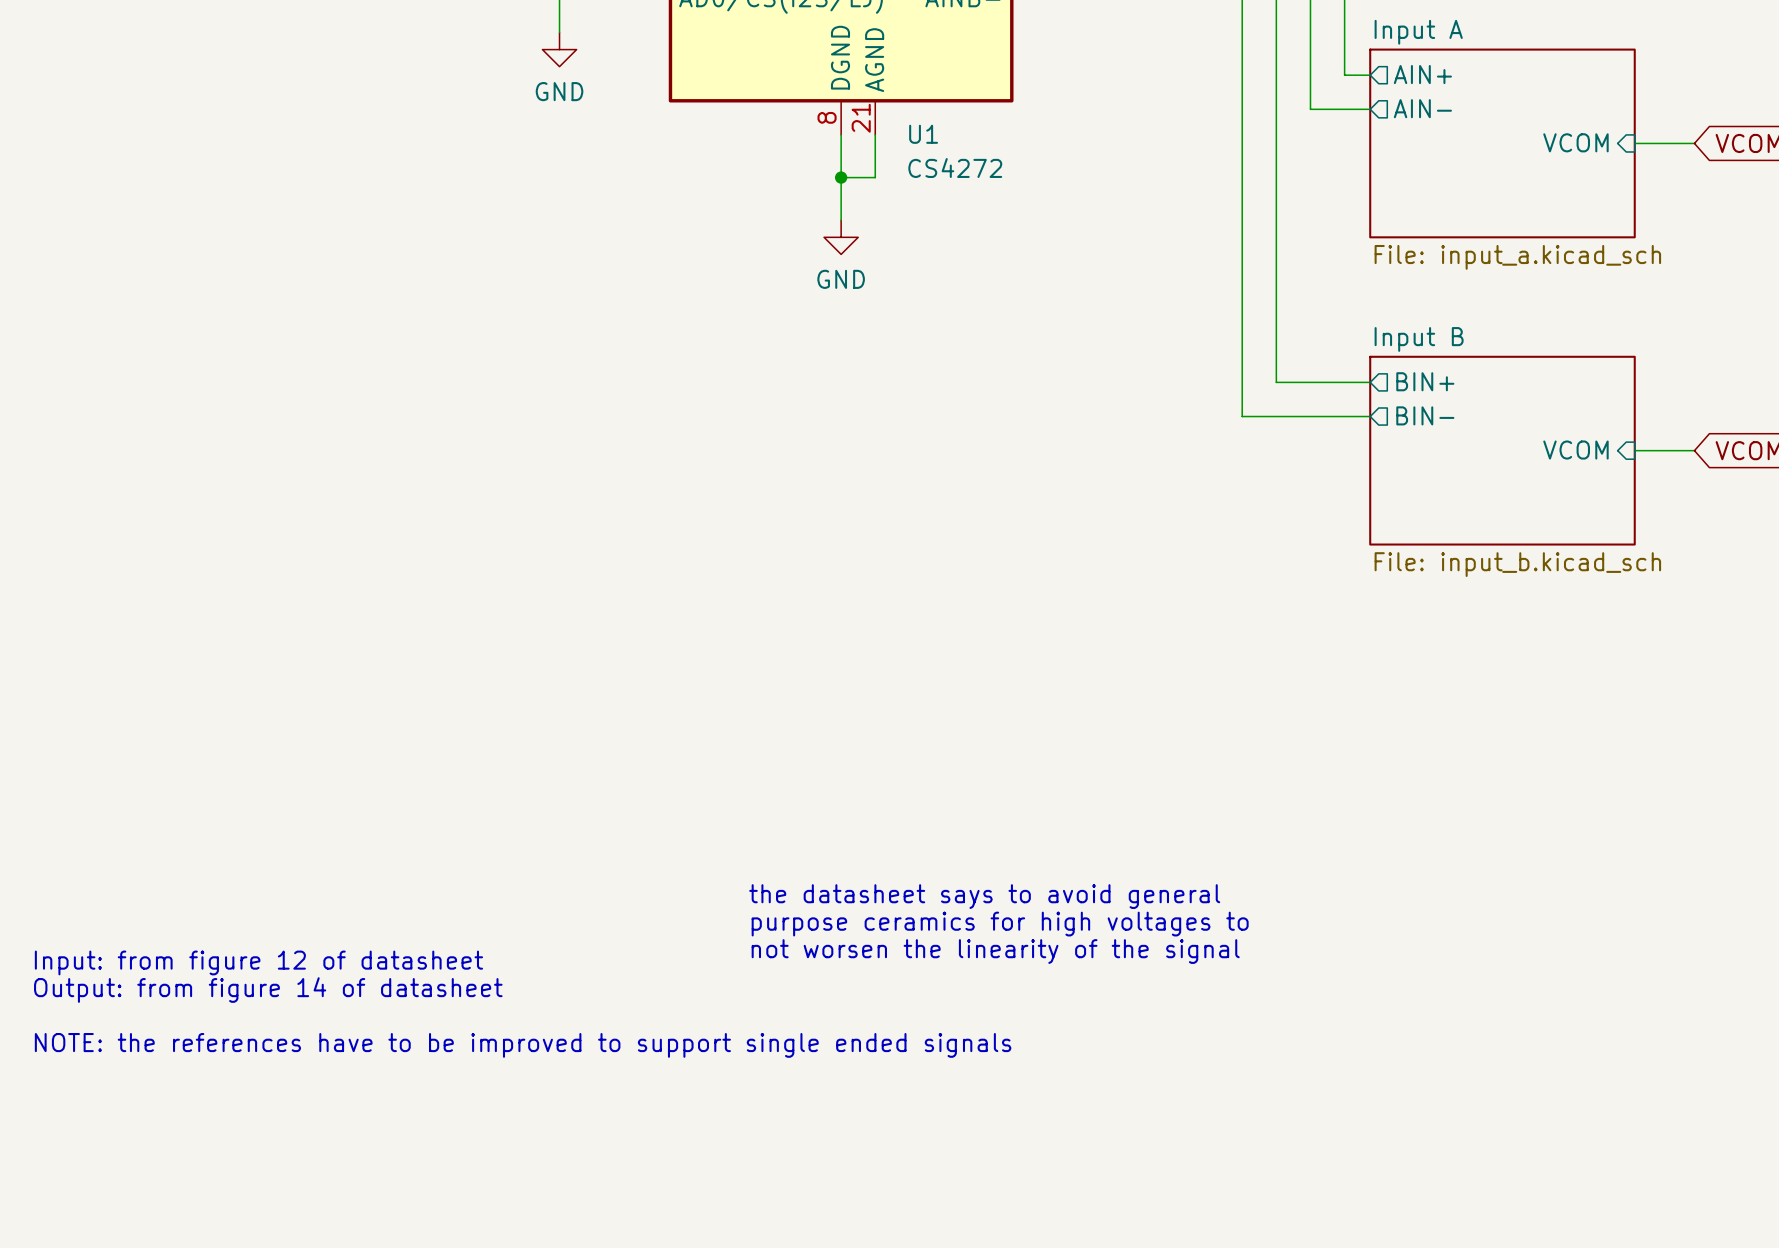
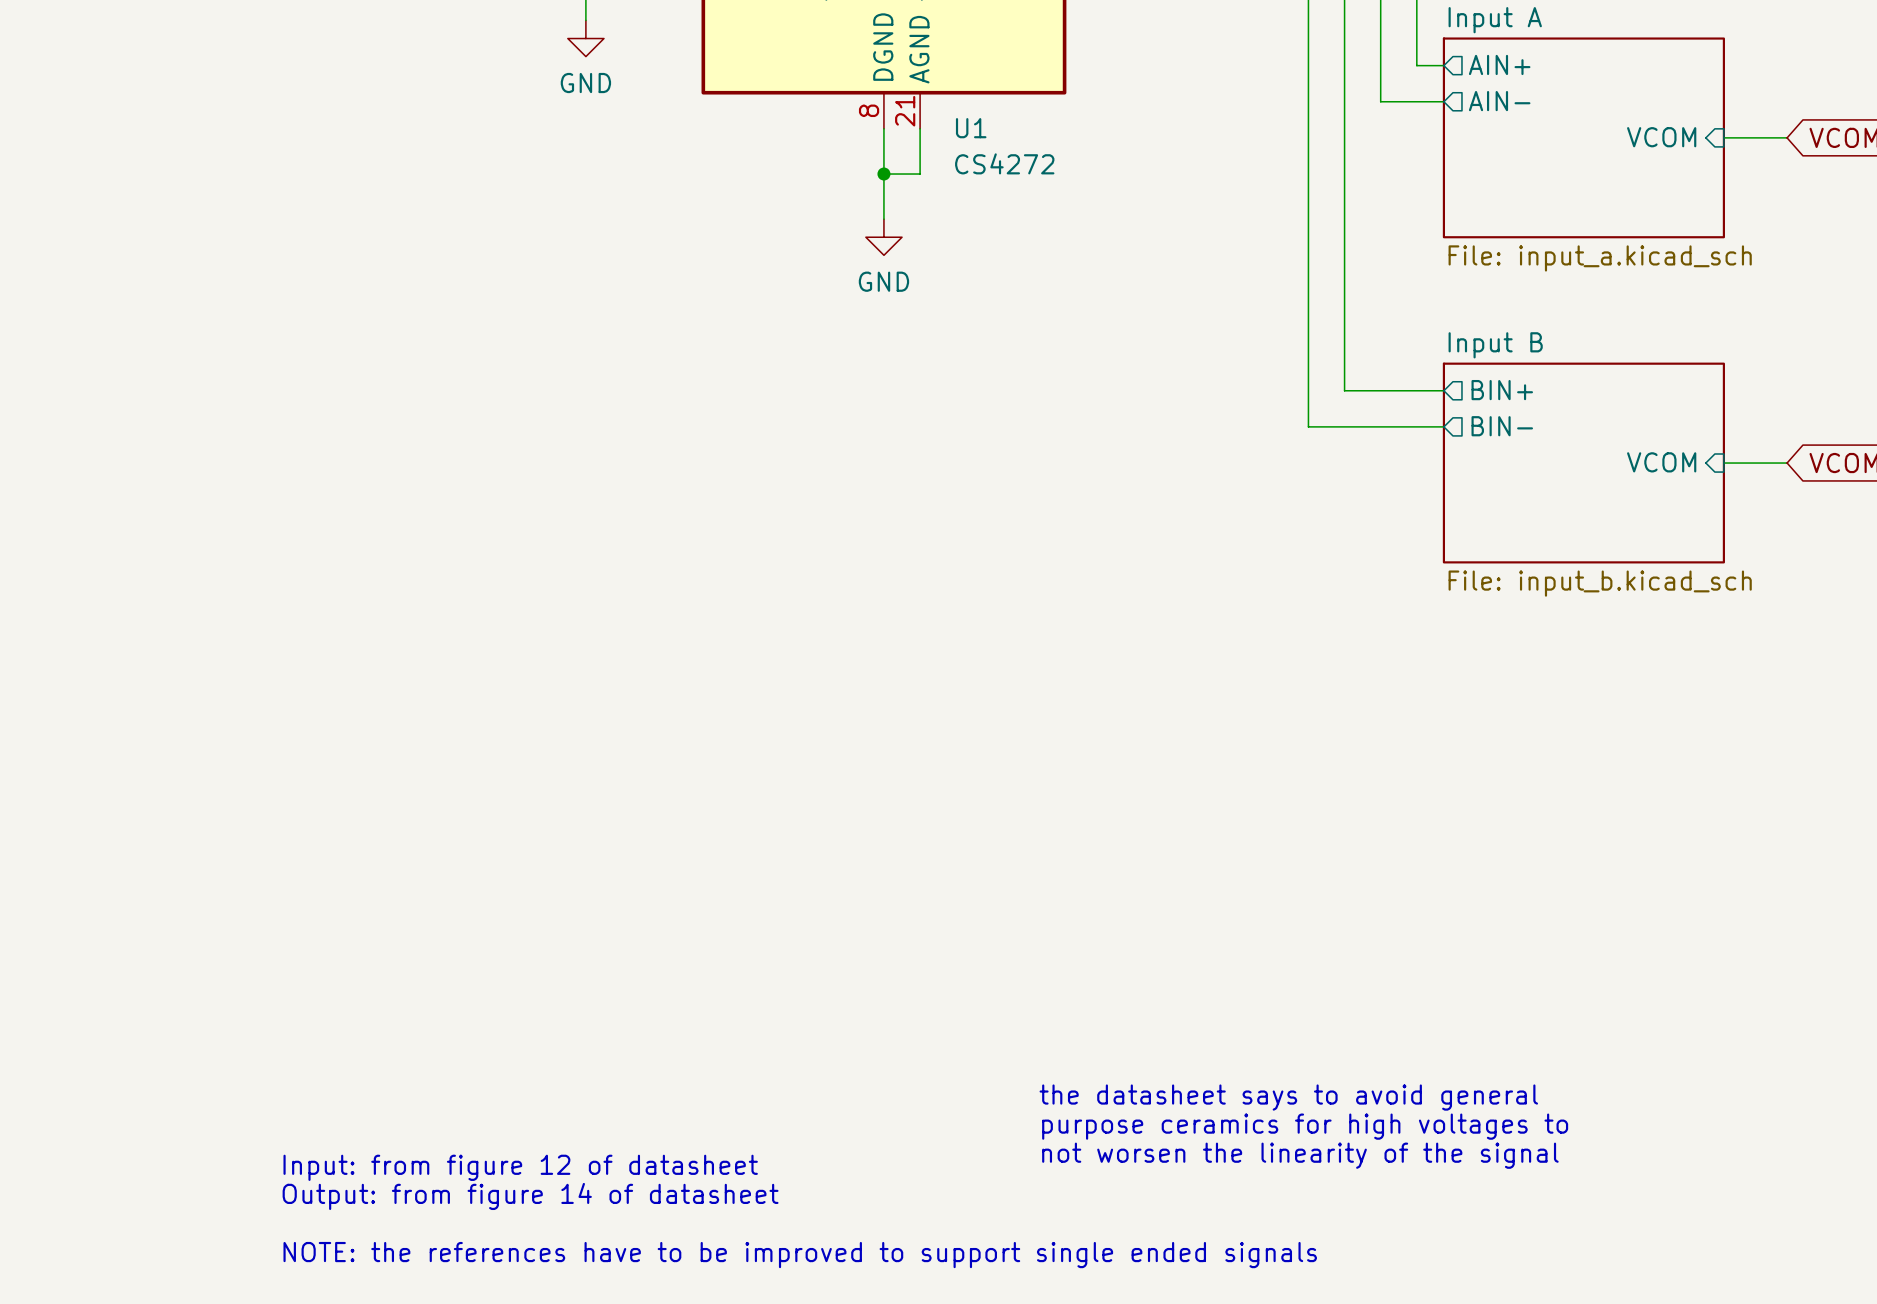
text position: the datasheet says to avoid general (984, 896) -> the datasheet says to avoid general (1288, 1097)
text position: purpose ceramics for high voltages to (1000, 924) -> purpose ceramics for high voltages to (1305, 1126)
text position: not worsen the linearity of the signal (995, 951) -> not worsen the linearity of the signal (1300, 1155)
text position: Input: from figure 12 of datasheet (258, 962) -> Input: from figure 12 of datasheet (520, 1167)
text position: Output: from figure 14 of datasheet (268, 990) -> Output: from figure 14 of datasheet (530, 1196)
text position: NOTE: the references have to be improved to support single ended signals (523, 1045) -> NOTE: the references have to be improved to support single ended signals (800, 1255)

